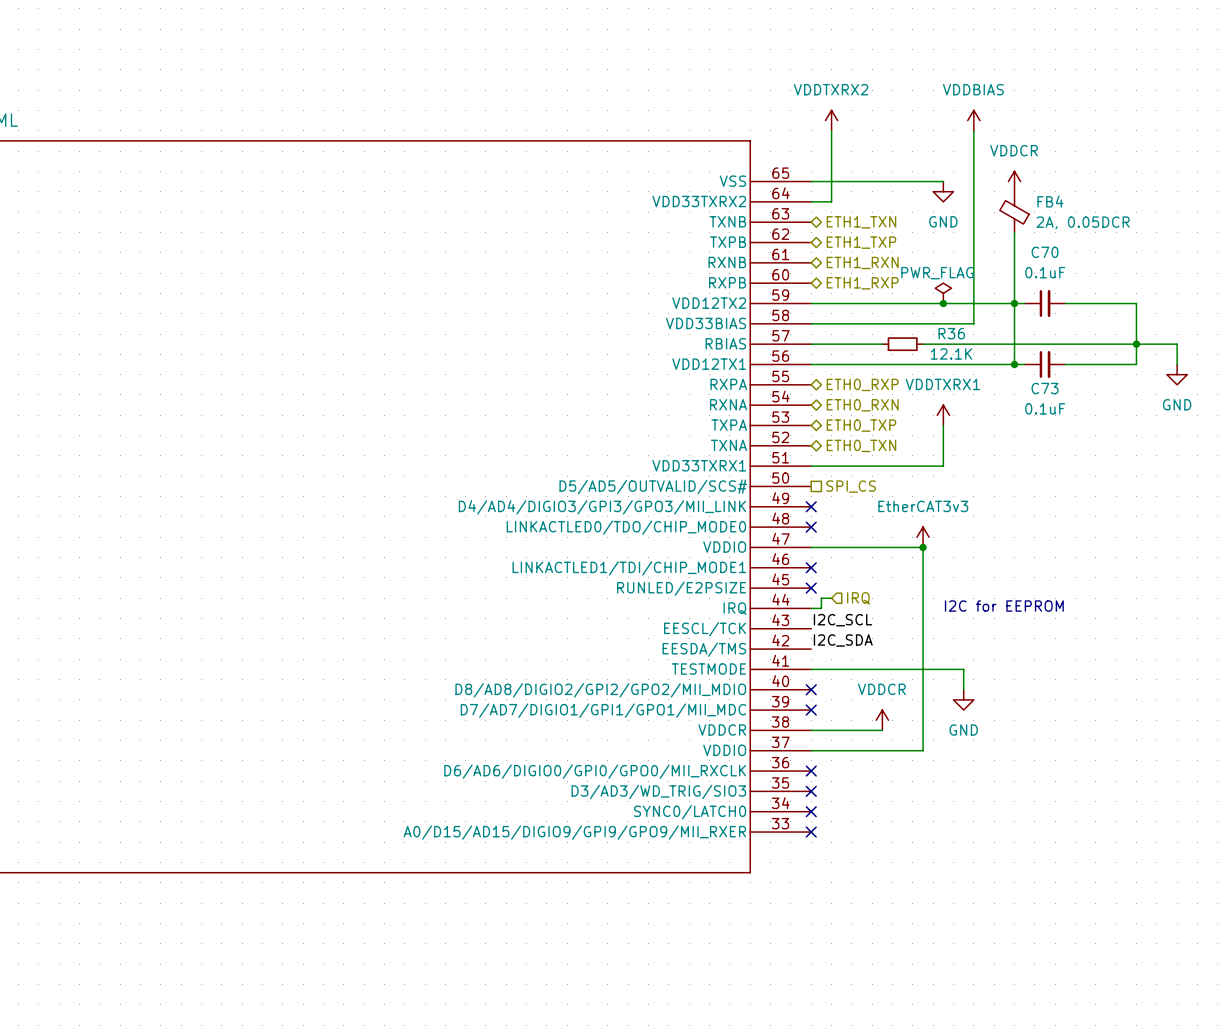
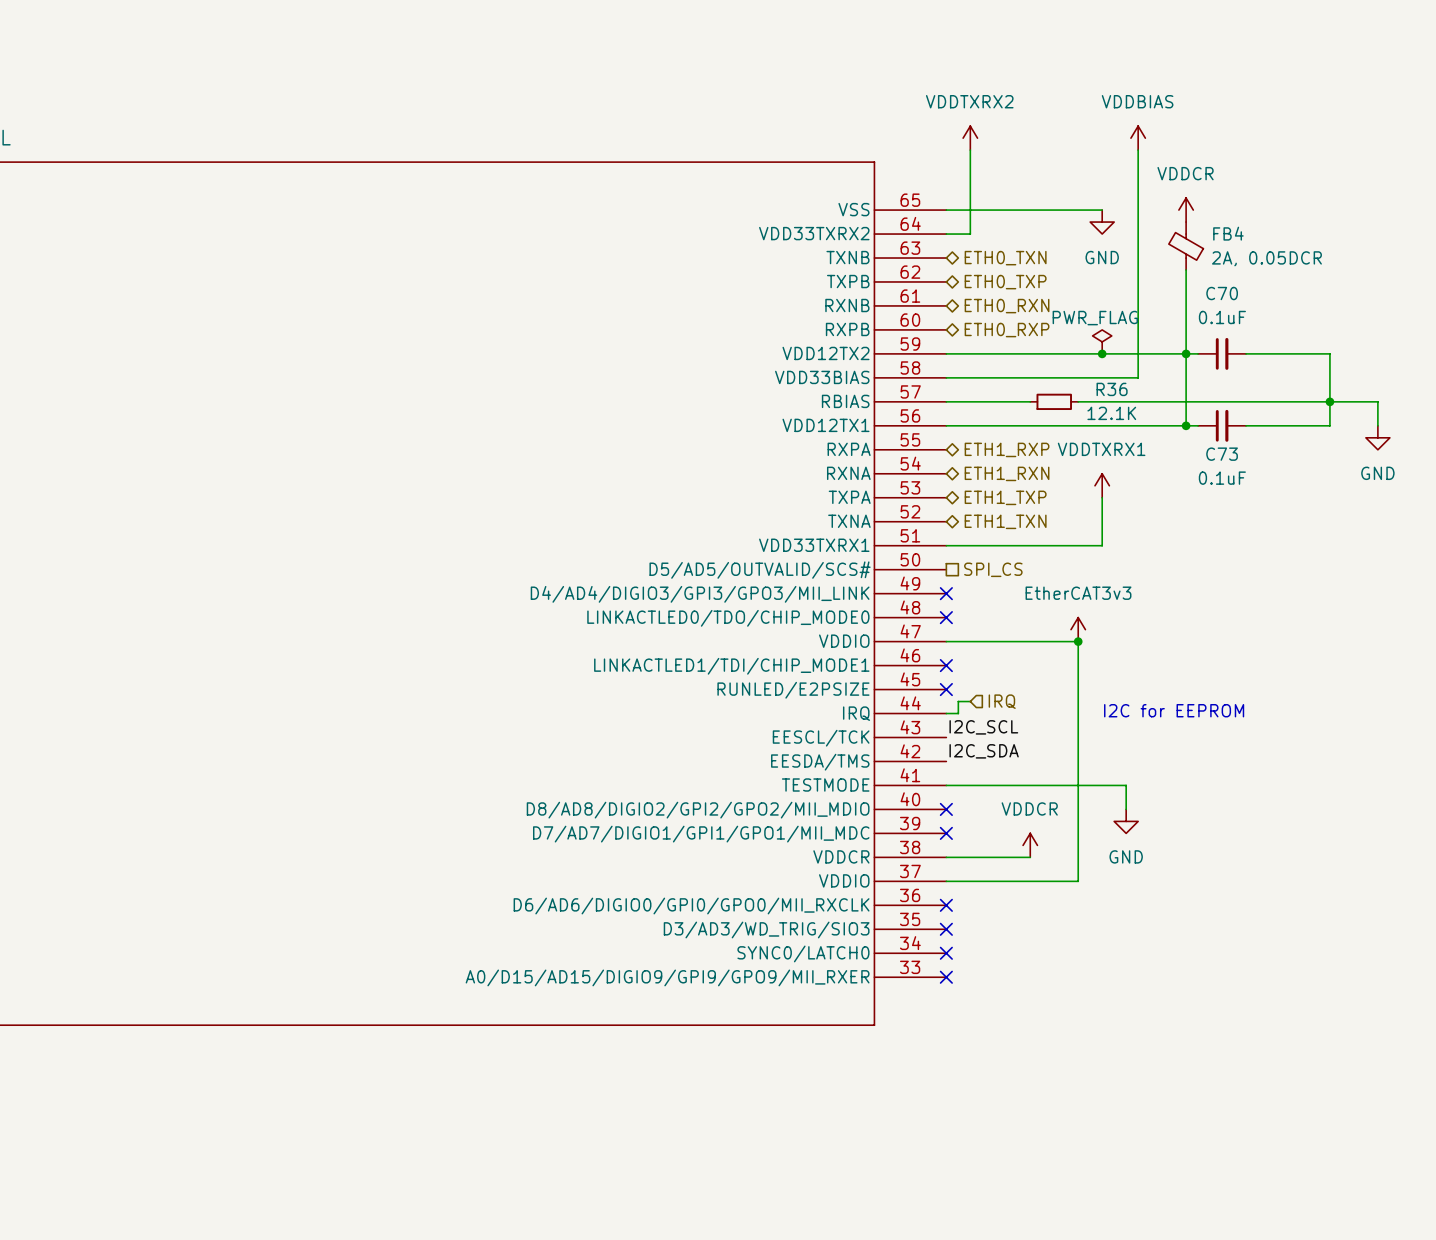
hierarchical label: ETH1_TXN (861, 222) -> ETH0_TXN (1005, 258)
hierarchical label: ETH1_TXP (861, 242) -> ETH0_TXP (1005, 282)
hierarchical label: ETH1_RXN (862, 262) -> ETH0_RXN (1007, 306)
hierarchical label: ETH1_RXP (862, 283) -> ETH0_RXP (1007, 330)
hierarchical label: ETH0_RXP (862, 384) -> ETH1_RXP (1007, 449)
hierarchical label: ETH0_RXN (862, 405) -> ETH1_RXN (1007, 473)
hierarchical label: ETH0_TXP (861, 425) -> ETH1_TXP (1005, 497)
hierarchical label: ETH0_TXN (861, 445) -> ETH1_TXN (1005, 521)

